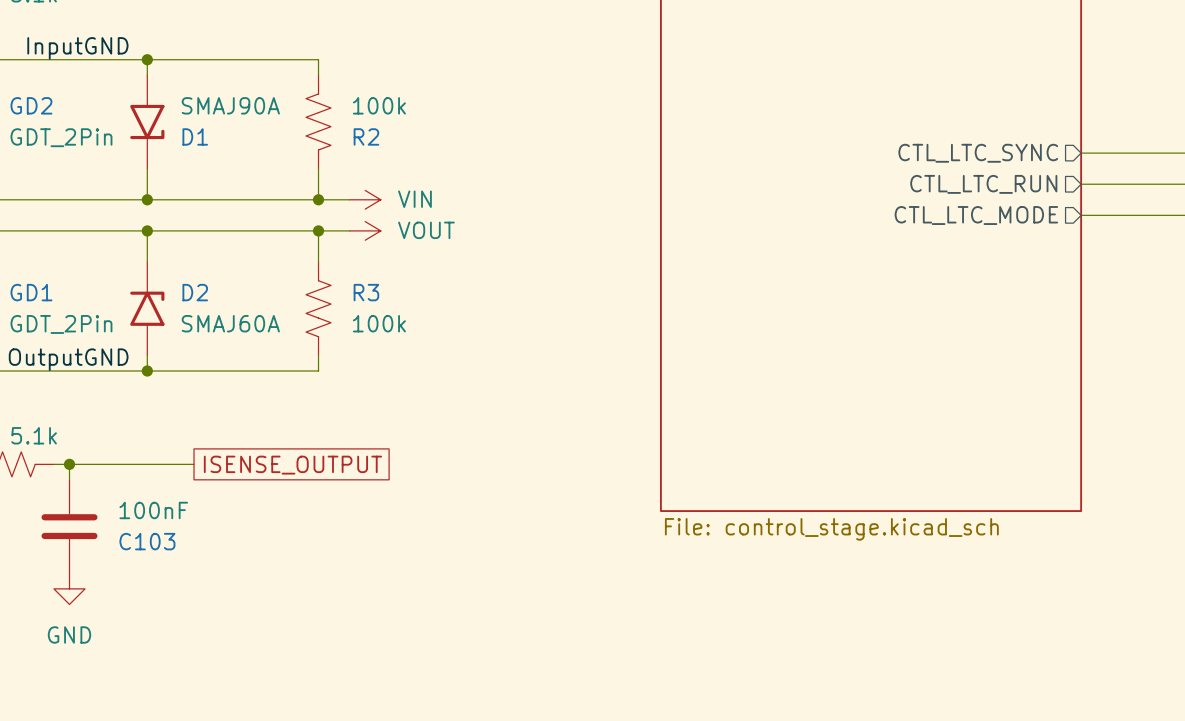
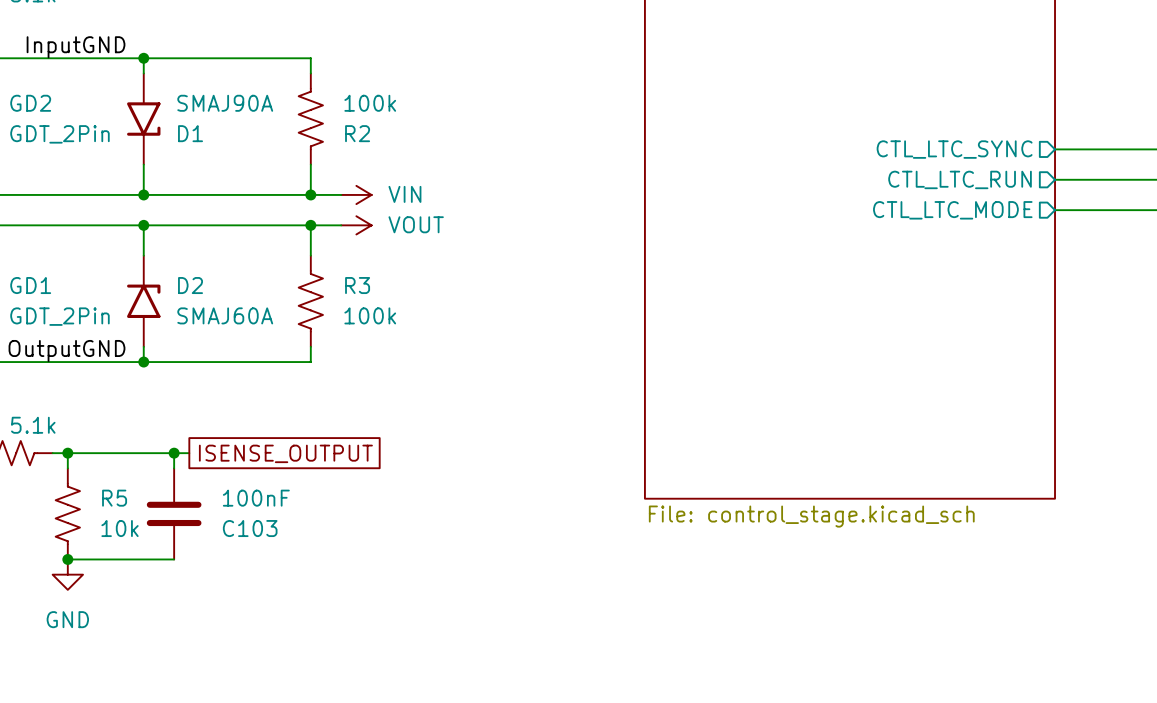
wire: none -> (174, 453) (174, 468)
junction: none -> (174, 453)
C103 position: (69, 526) -> (174, 513)
R5: none -> 10k (67, 513)
wire: none -> (67, 559) (174, 559)
junction: none -> (67, 559)

